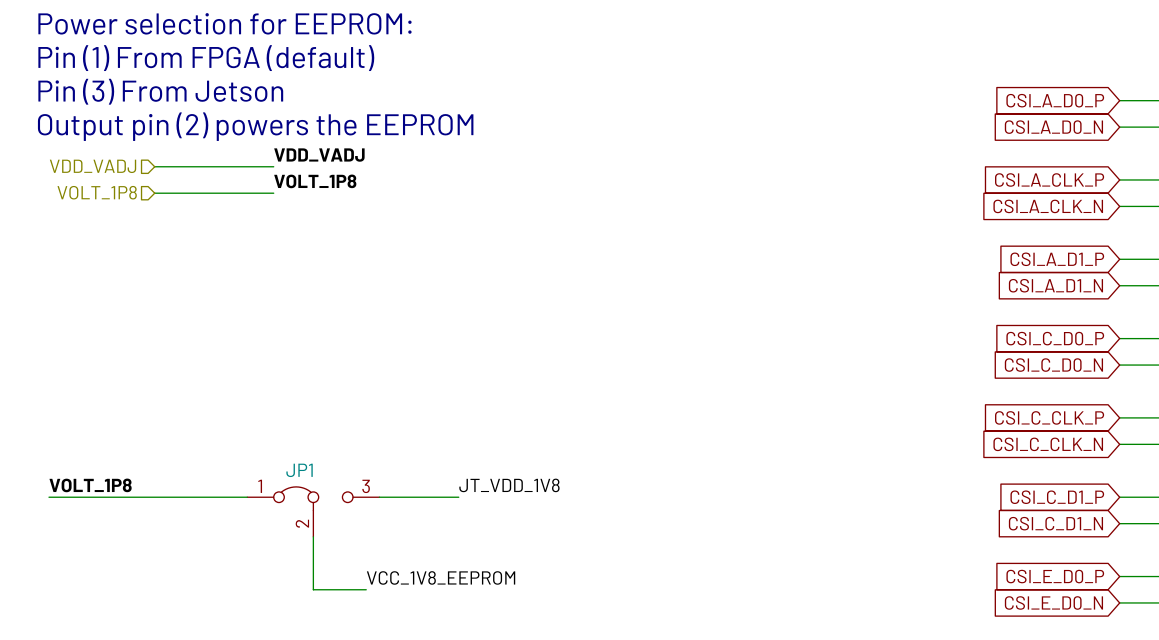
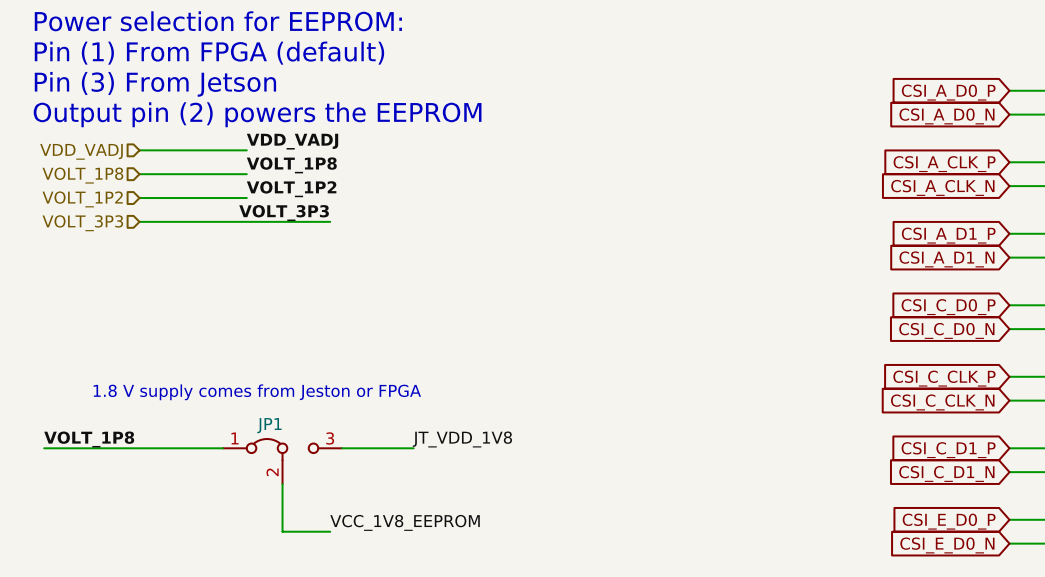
label: none -> VOLT_1P2 (291, 189)
hierarchical label: none -> VOLT_1P2 (82, 199)
wire: none -> (139, 198) (246, 198)
label: none -> VOLT_3P3 (284, 213)
hierarchical label: none -> VOLT_3P3 (82, 223)
wire: none -> (139, 221) (330, 221)
text: none -> 1.8 V supply comes from Jeston or FPGA (257, 392)

